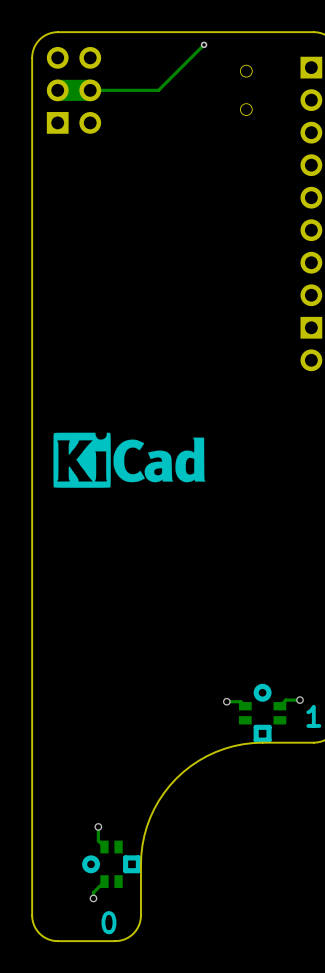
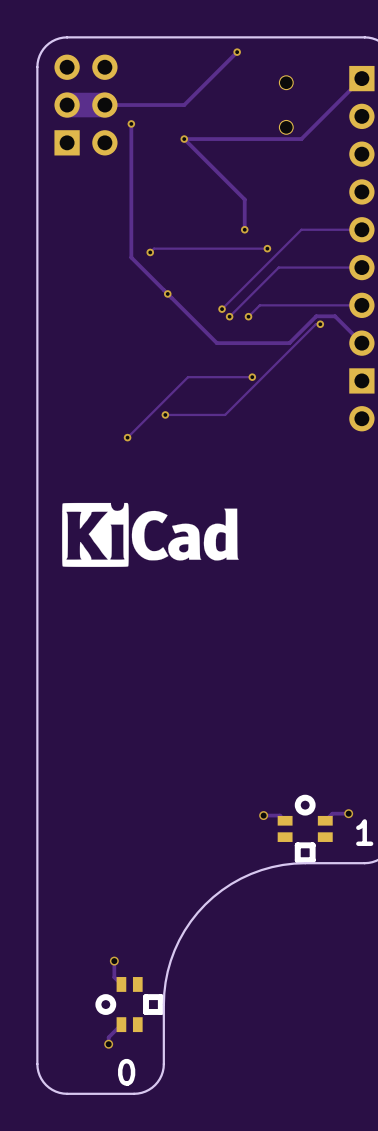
track: none -> (361, 78) (301, 139) (184, 139) (244, 199) (244, 229)
track: none -> (131, 123) (131, 257) (216, 343) (289, 343) (316, 316) (335, 316) (361, 343)
via: none -> (131, 123)
via: none -> (184, 139)
via: none -> (244, 229)
track: none -> (361, 229) (301, 229) (222, 309)
track: none -> (267, 248) (154, 248) (150, 252)
via: none -> (267, 248)
via: none -> (150, 252)
track: none -> (361, 267) (278, 267) (229, 316)
via: none -> (167, 293)
track: none -> (361, 305) (259, 305) (248, 316)
via: none -> (222, 309)
via: none -> (229, 316)
via: none -> (248, 316)
track: none -> (320, 324) (315, 324) (225, 414) (165, 414)
via: none -> (320, 324)
track: none -> (252, 377) (188, 377) (127, 437)
via: none -> (252, 377)
via: none -> (165, 414)
via: none -> (127, 437)

